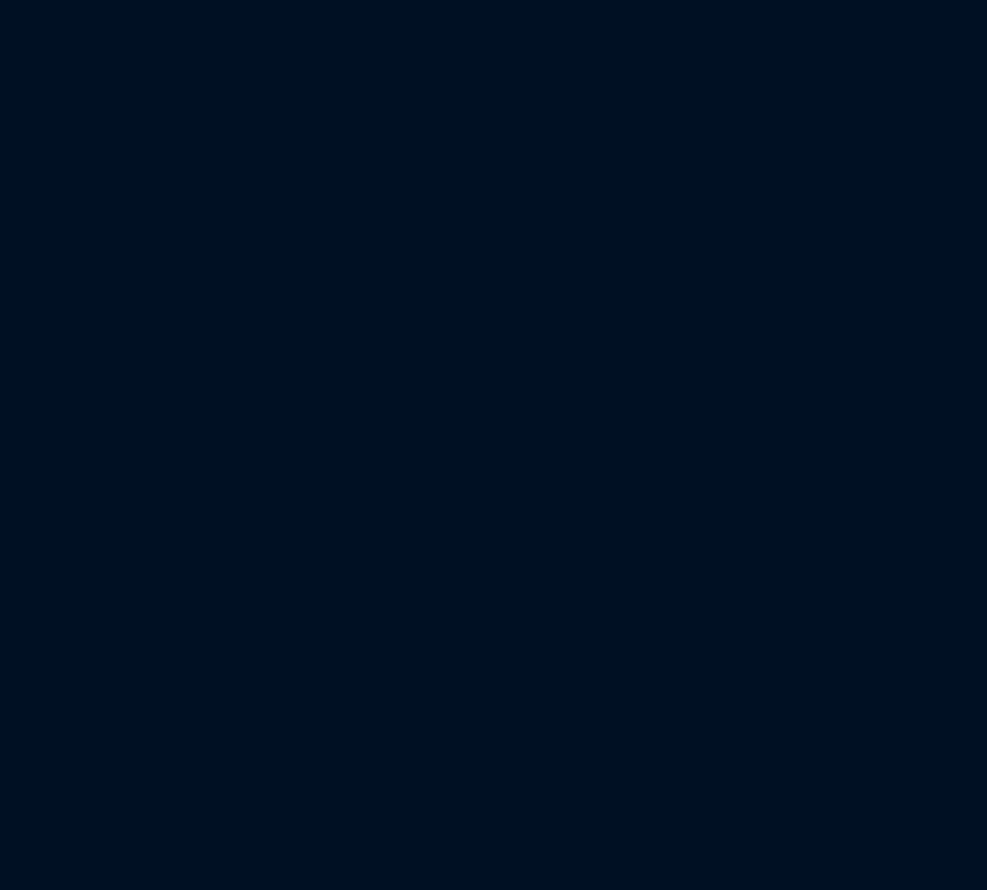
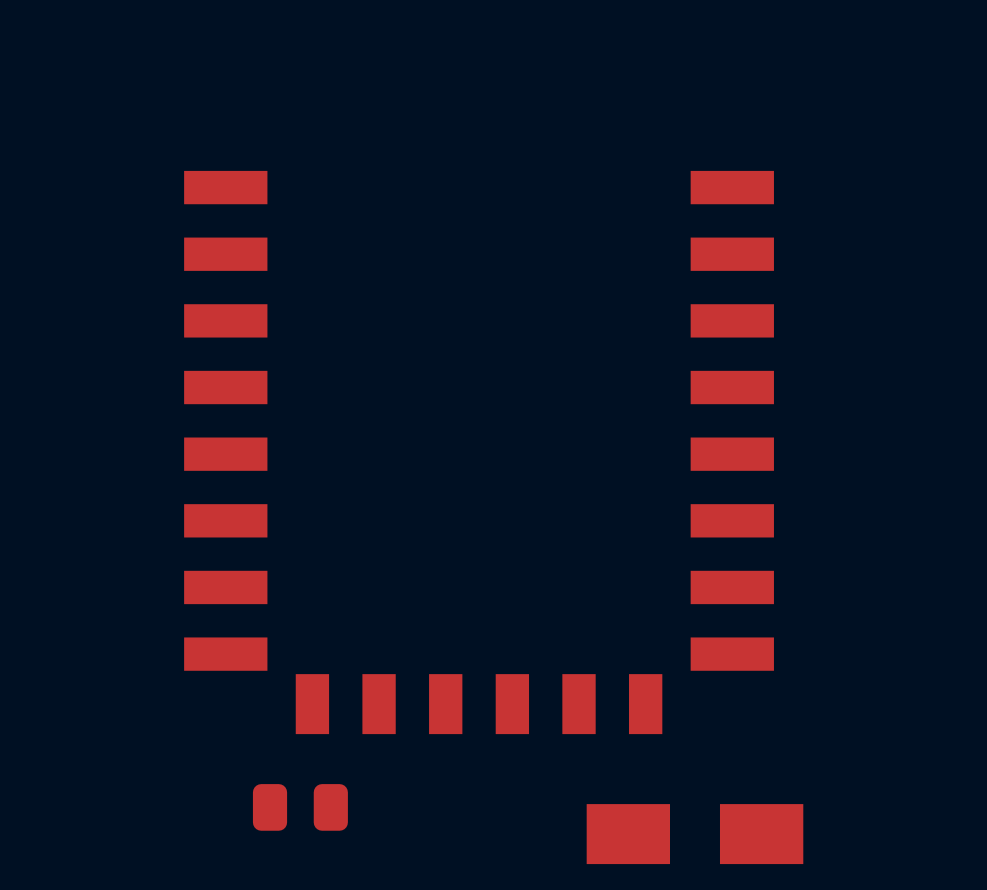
part: none -> (479, 452)
part: none -> (300, 807)
part: none -> (694, 834)

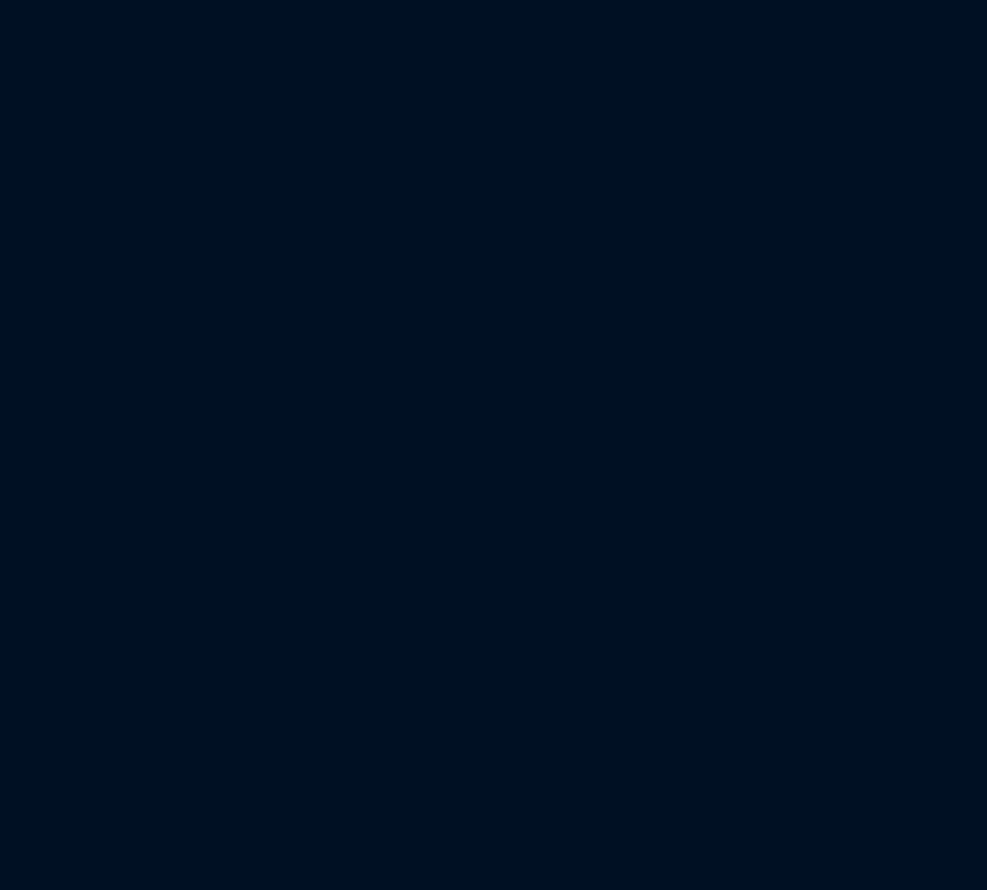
part: (479, 452) -> none
part: (300, 807) -> none
part: (694, 834) -> none

